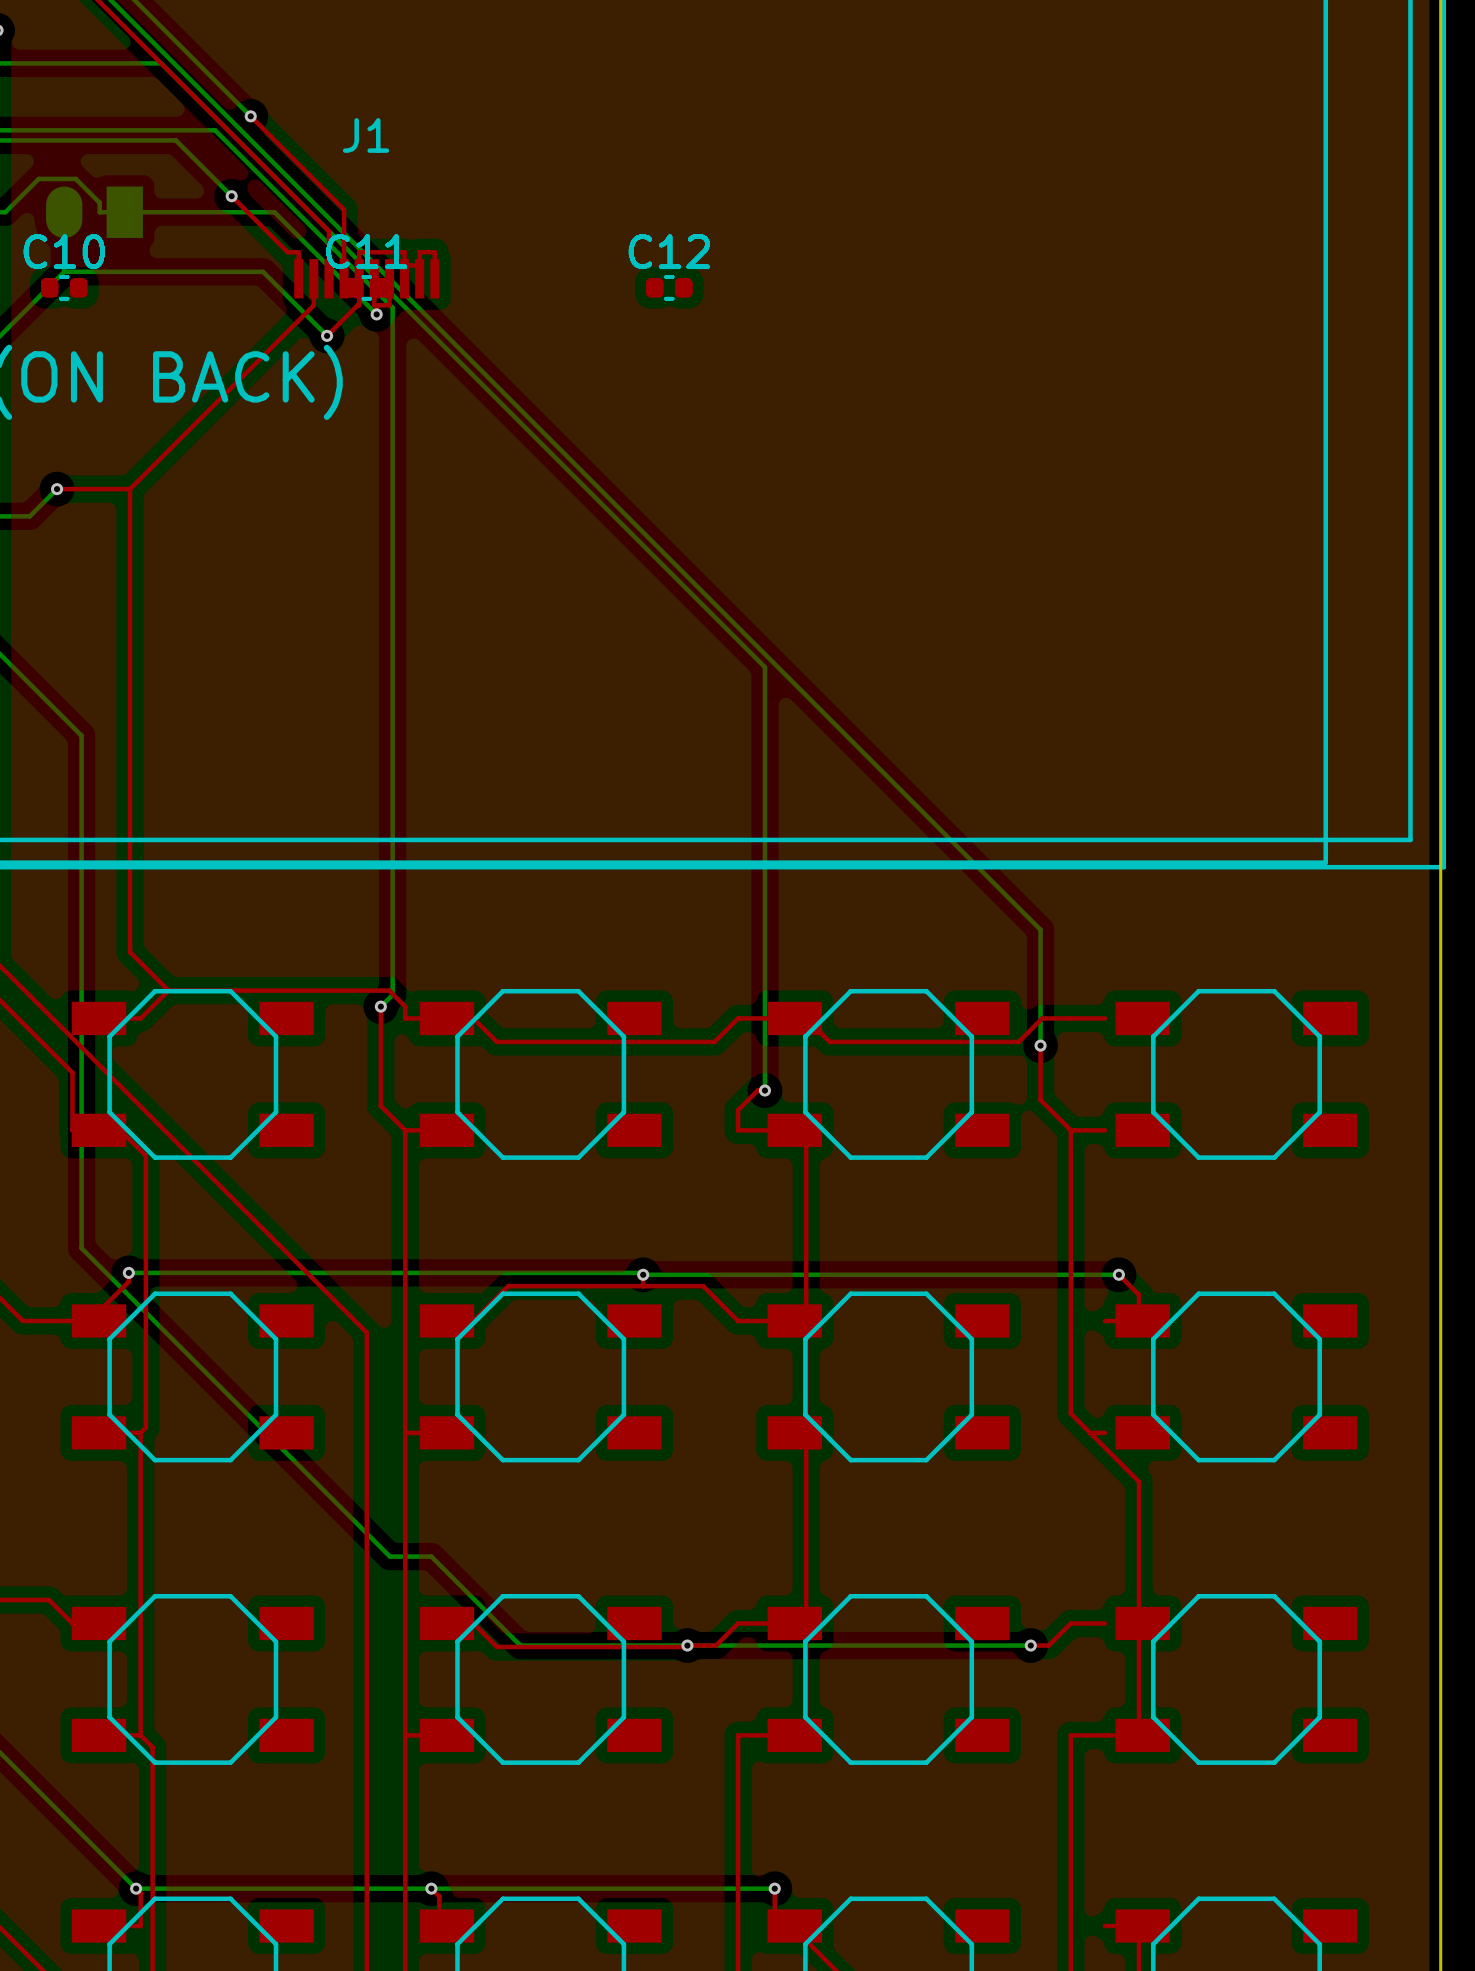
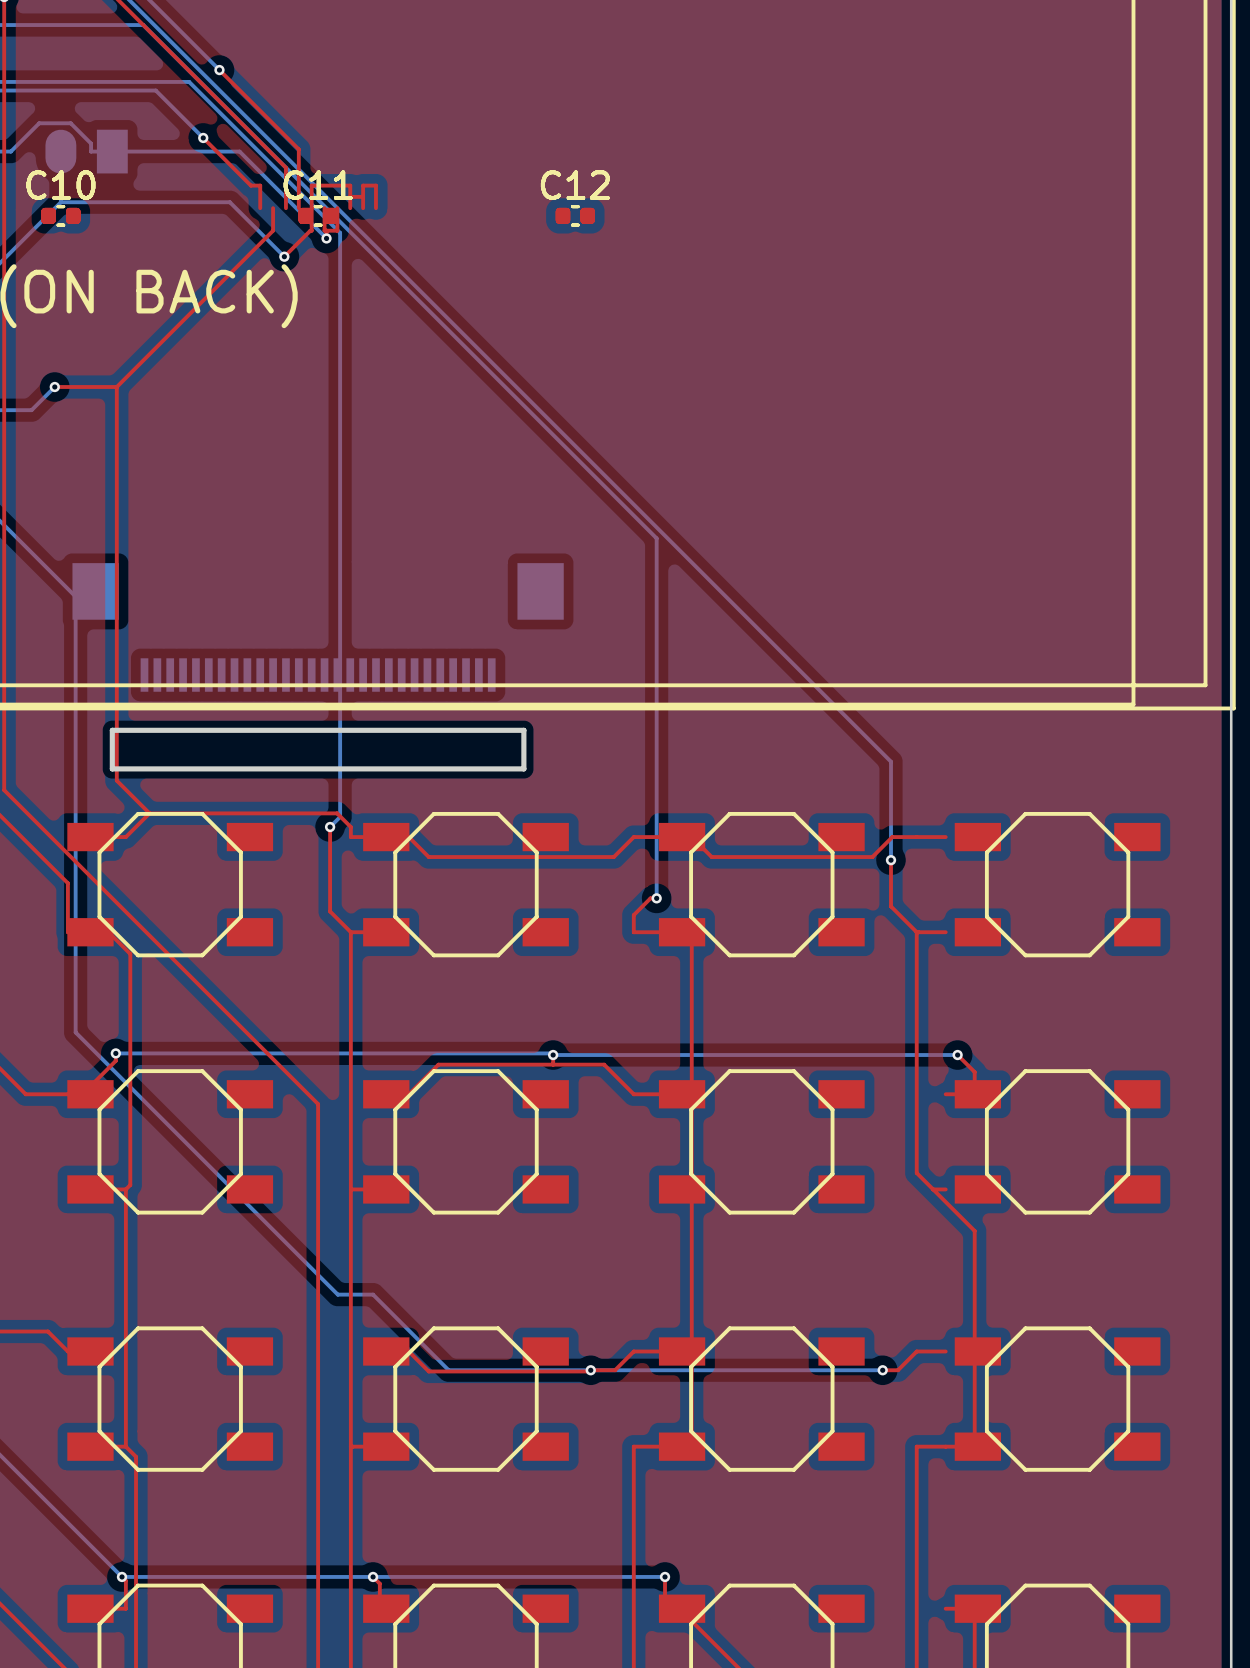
J1: (366, 278) -> none
part: none -> (318, 627)
board edge: none -> (112, 730) (523, 730) (523, 768) (112, 768) (112, 730)

